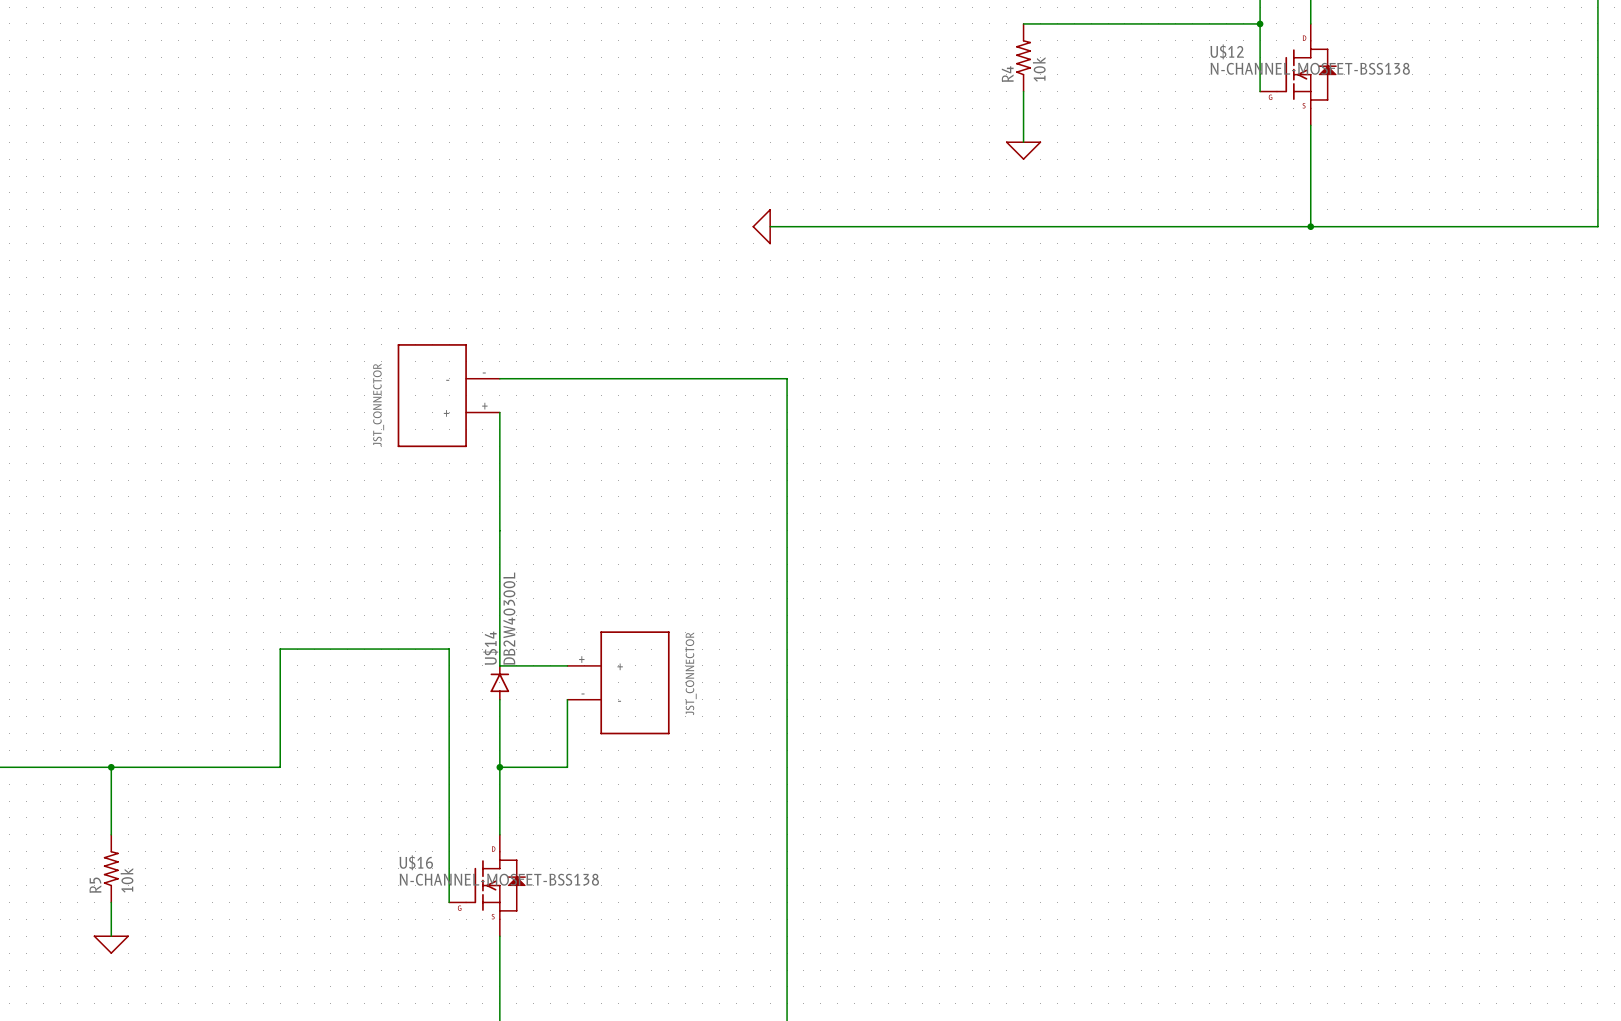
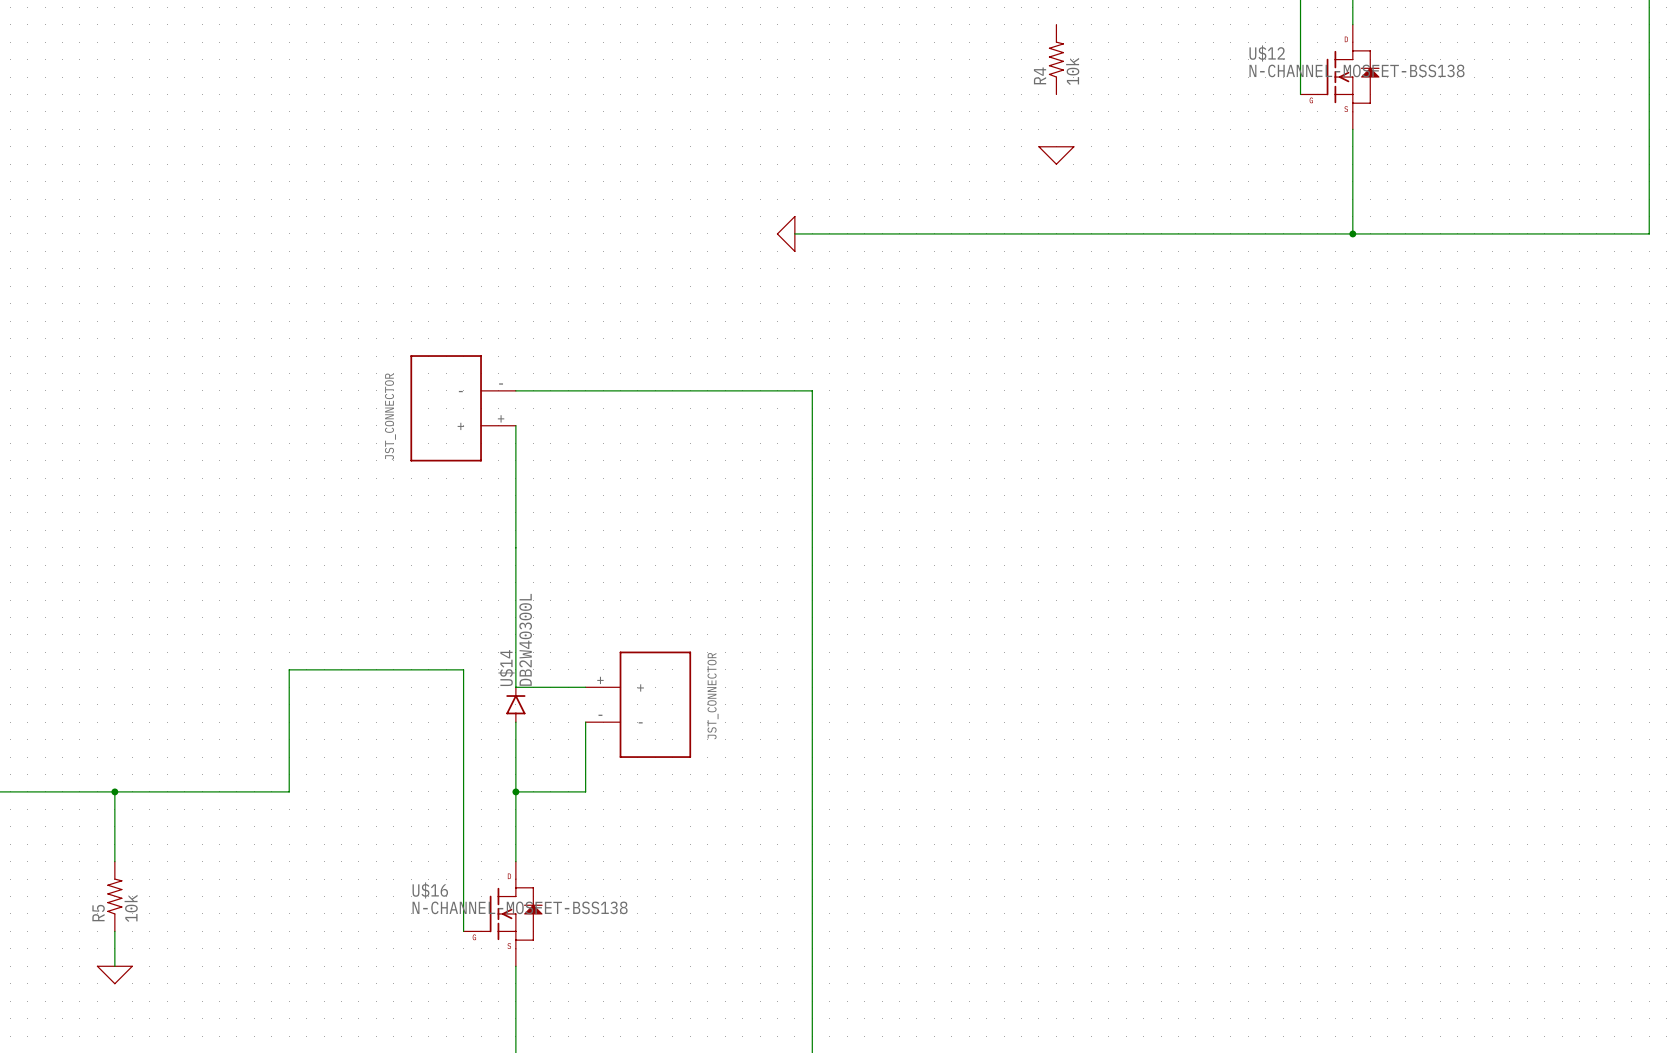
wire: (1023, 23) (1260, 23) -> none
junction: (1260, 23) -> none
wire: (1023, 91) (1023, 142) -> none

